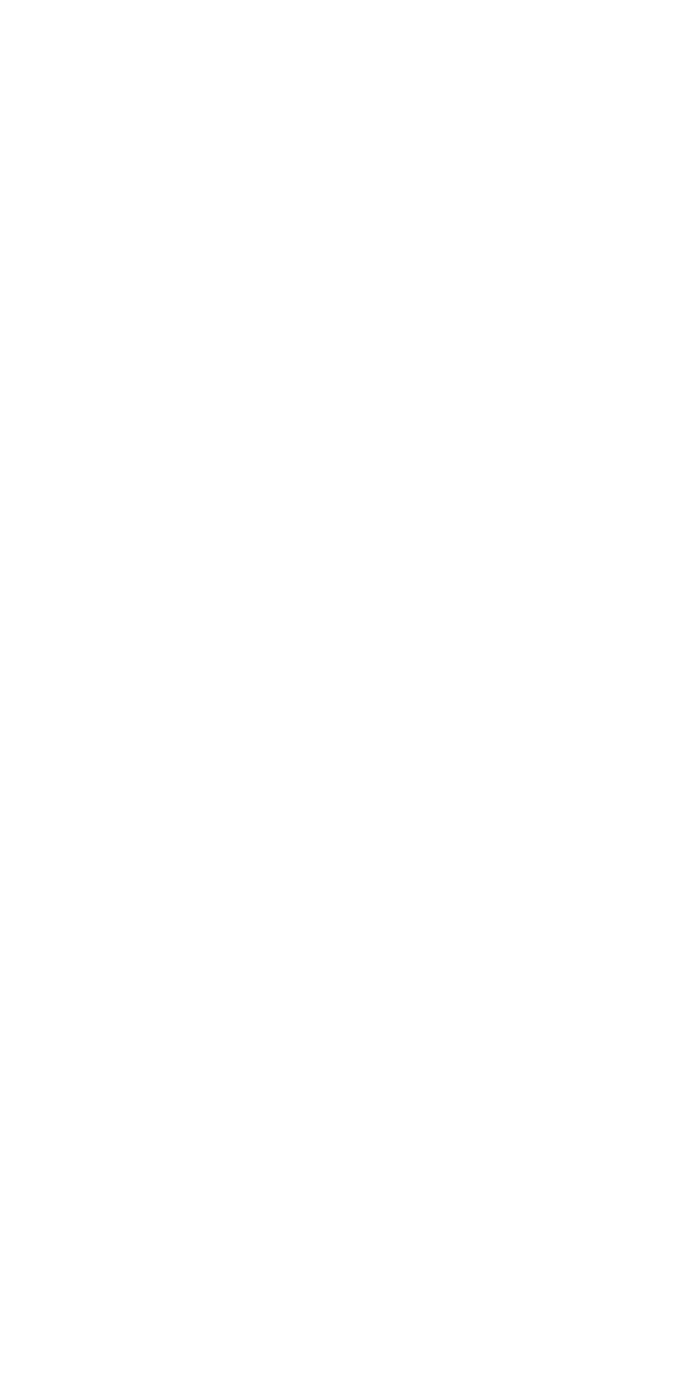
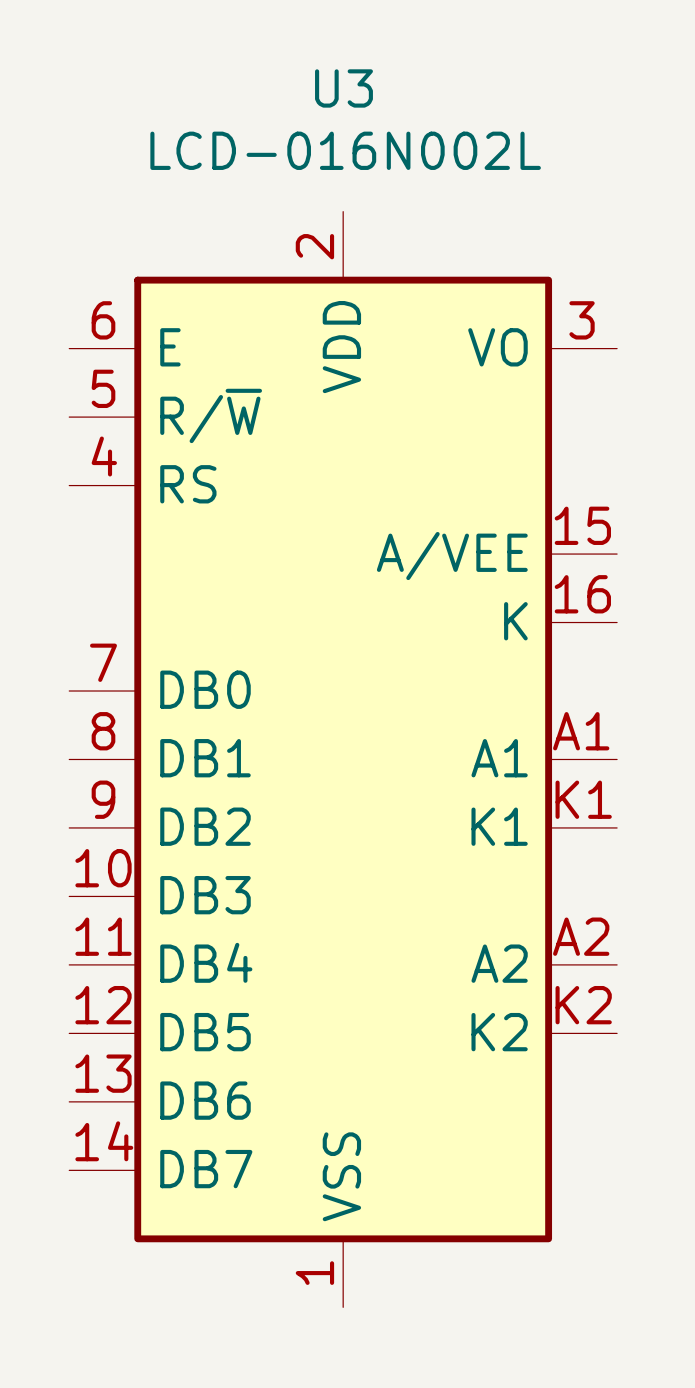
U3: none -> LCD-016N002L (343, 759)

